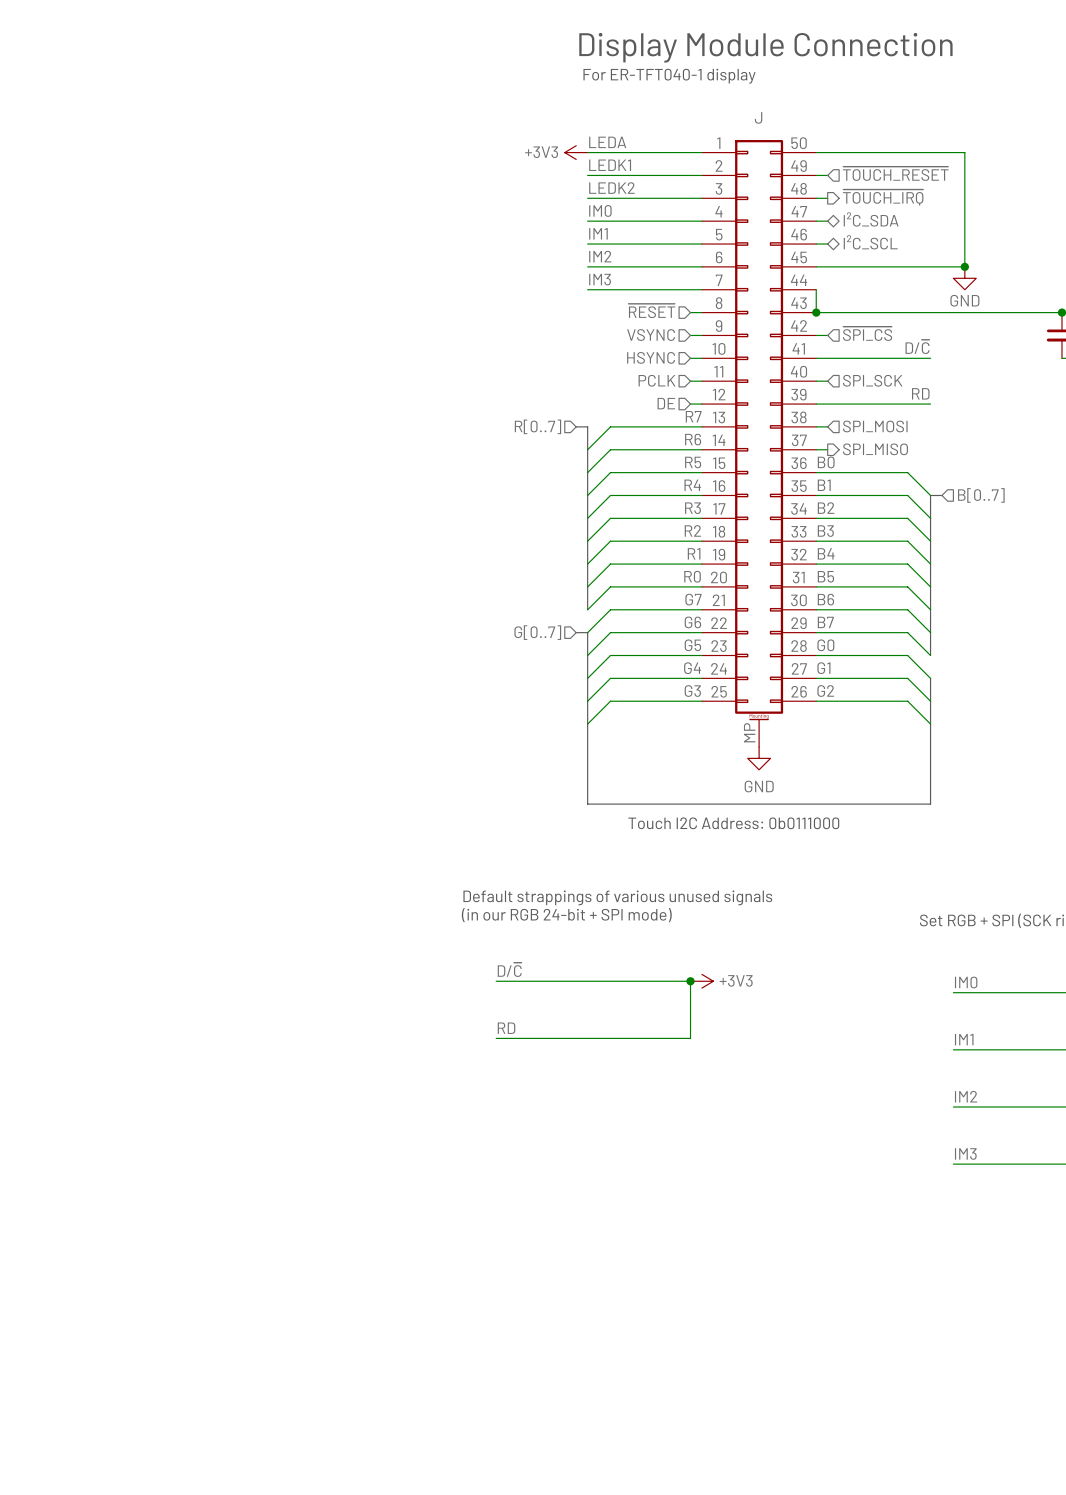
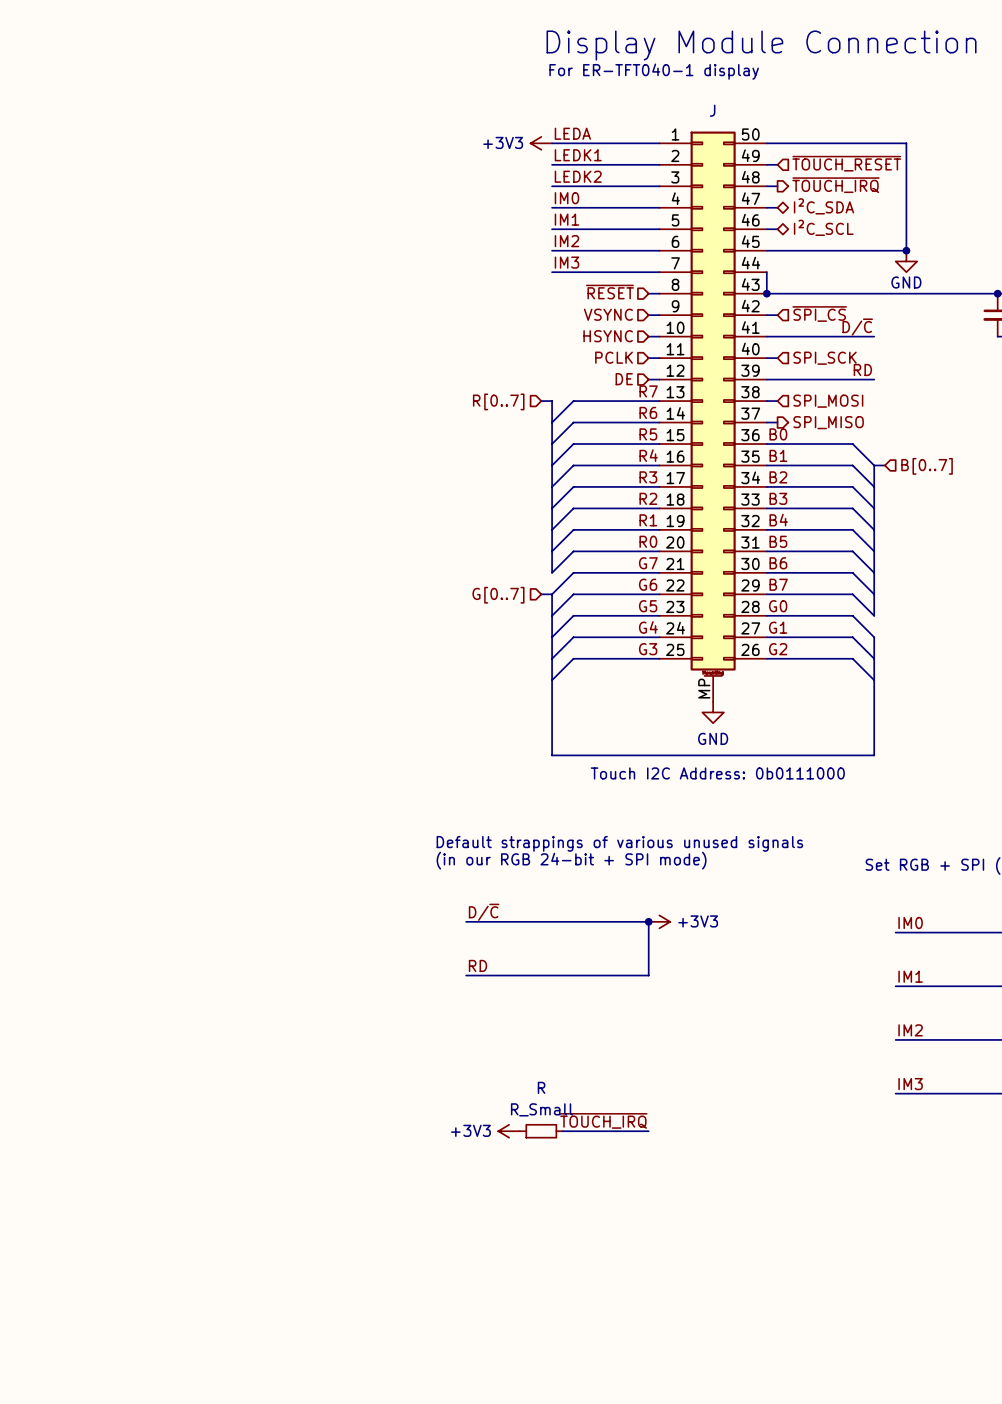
label: none -> ~{TOUCH_IRQ} (603, 1120)
power symbol: none -> +3V3 (509, 1131)
R: none -> R_Small (541, 1131)
wire: none -> (562, 1131) (648, 1131)

